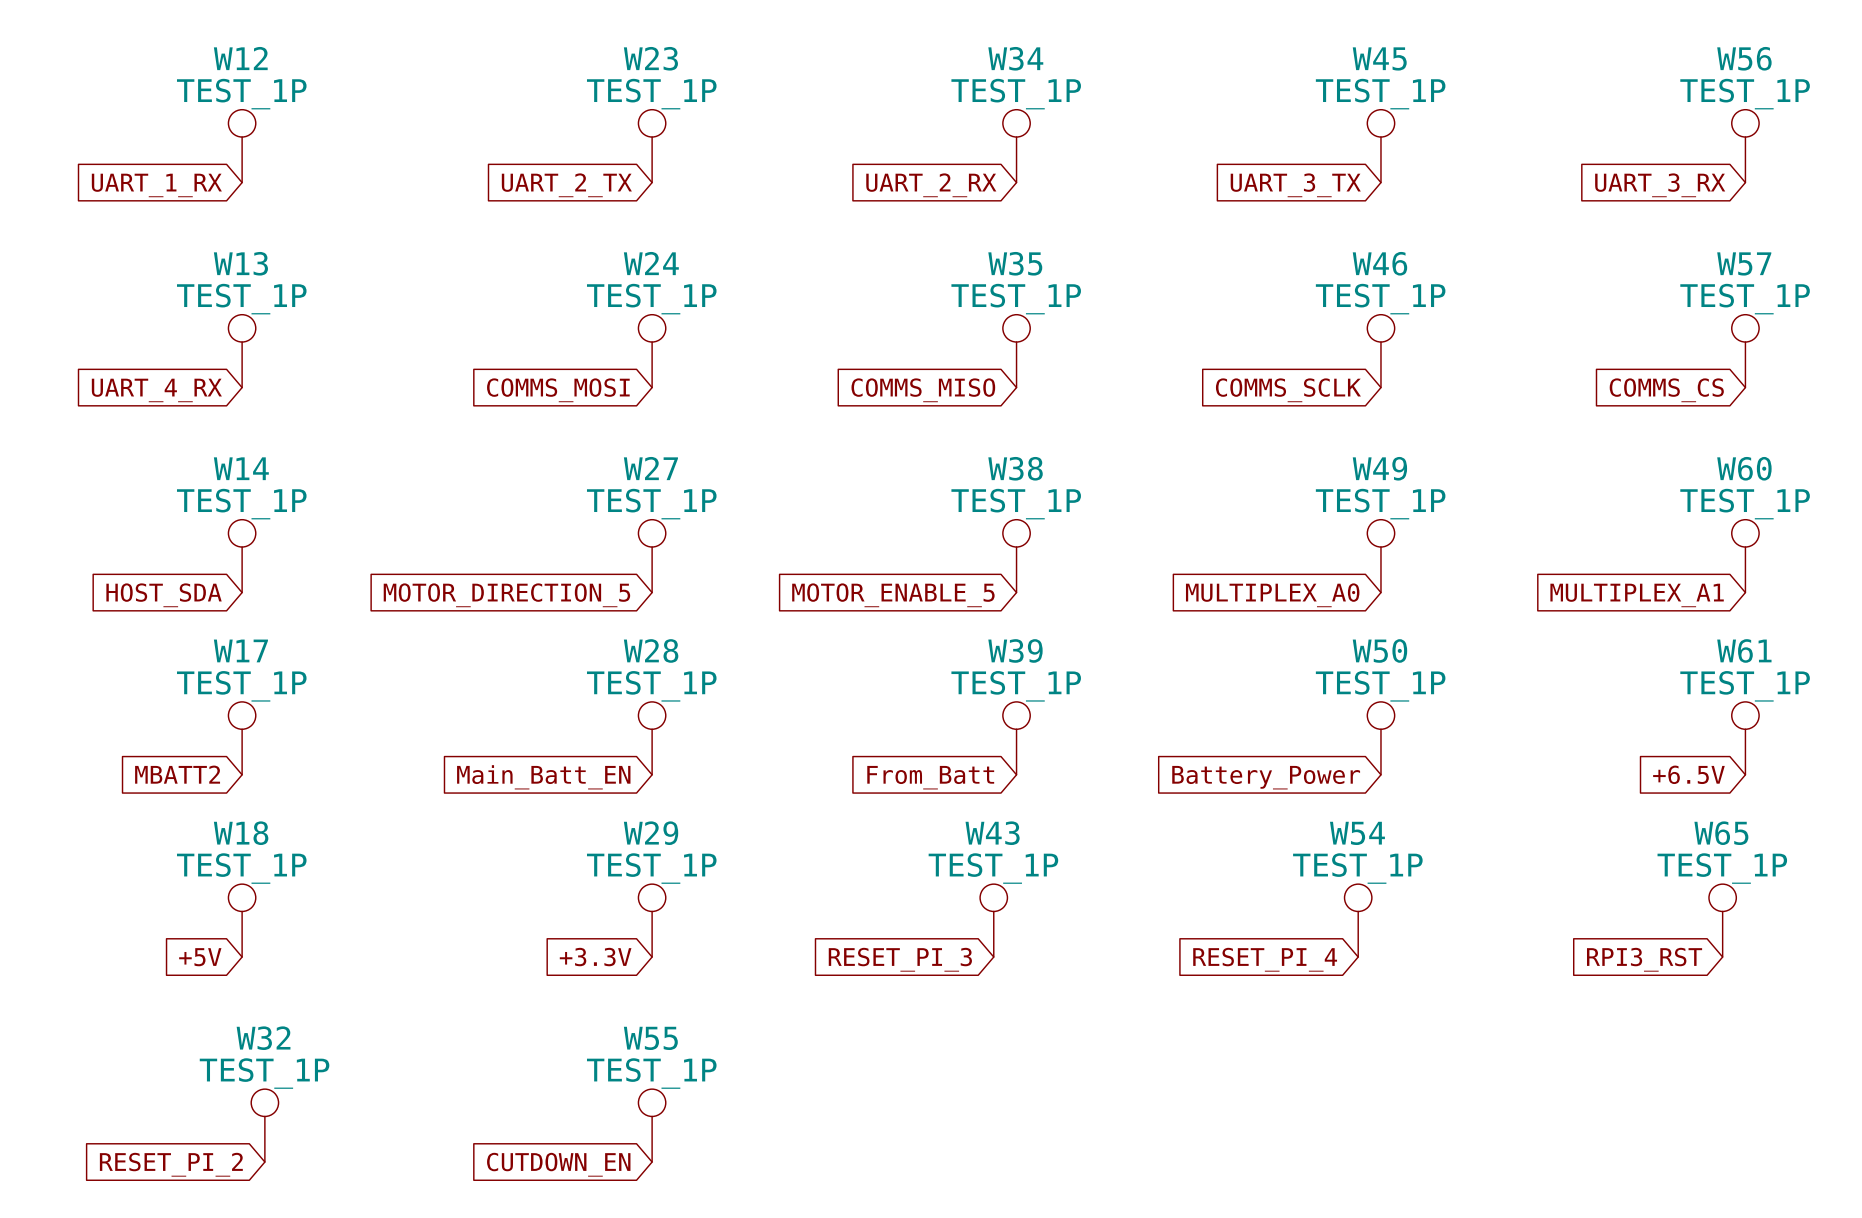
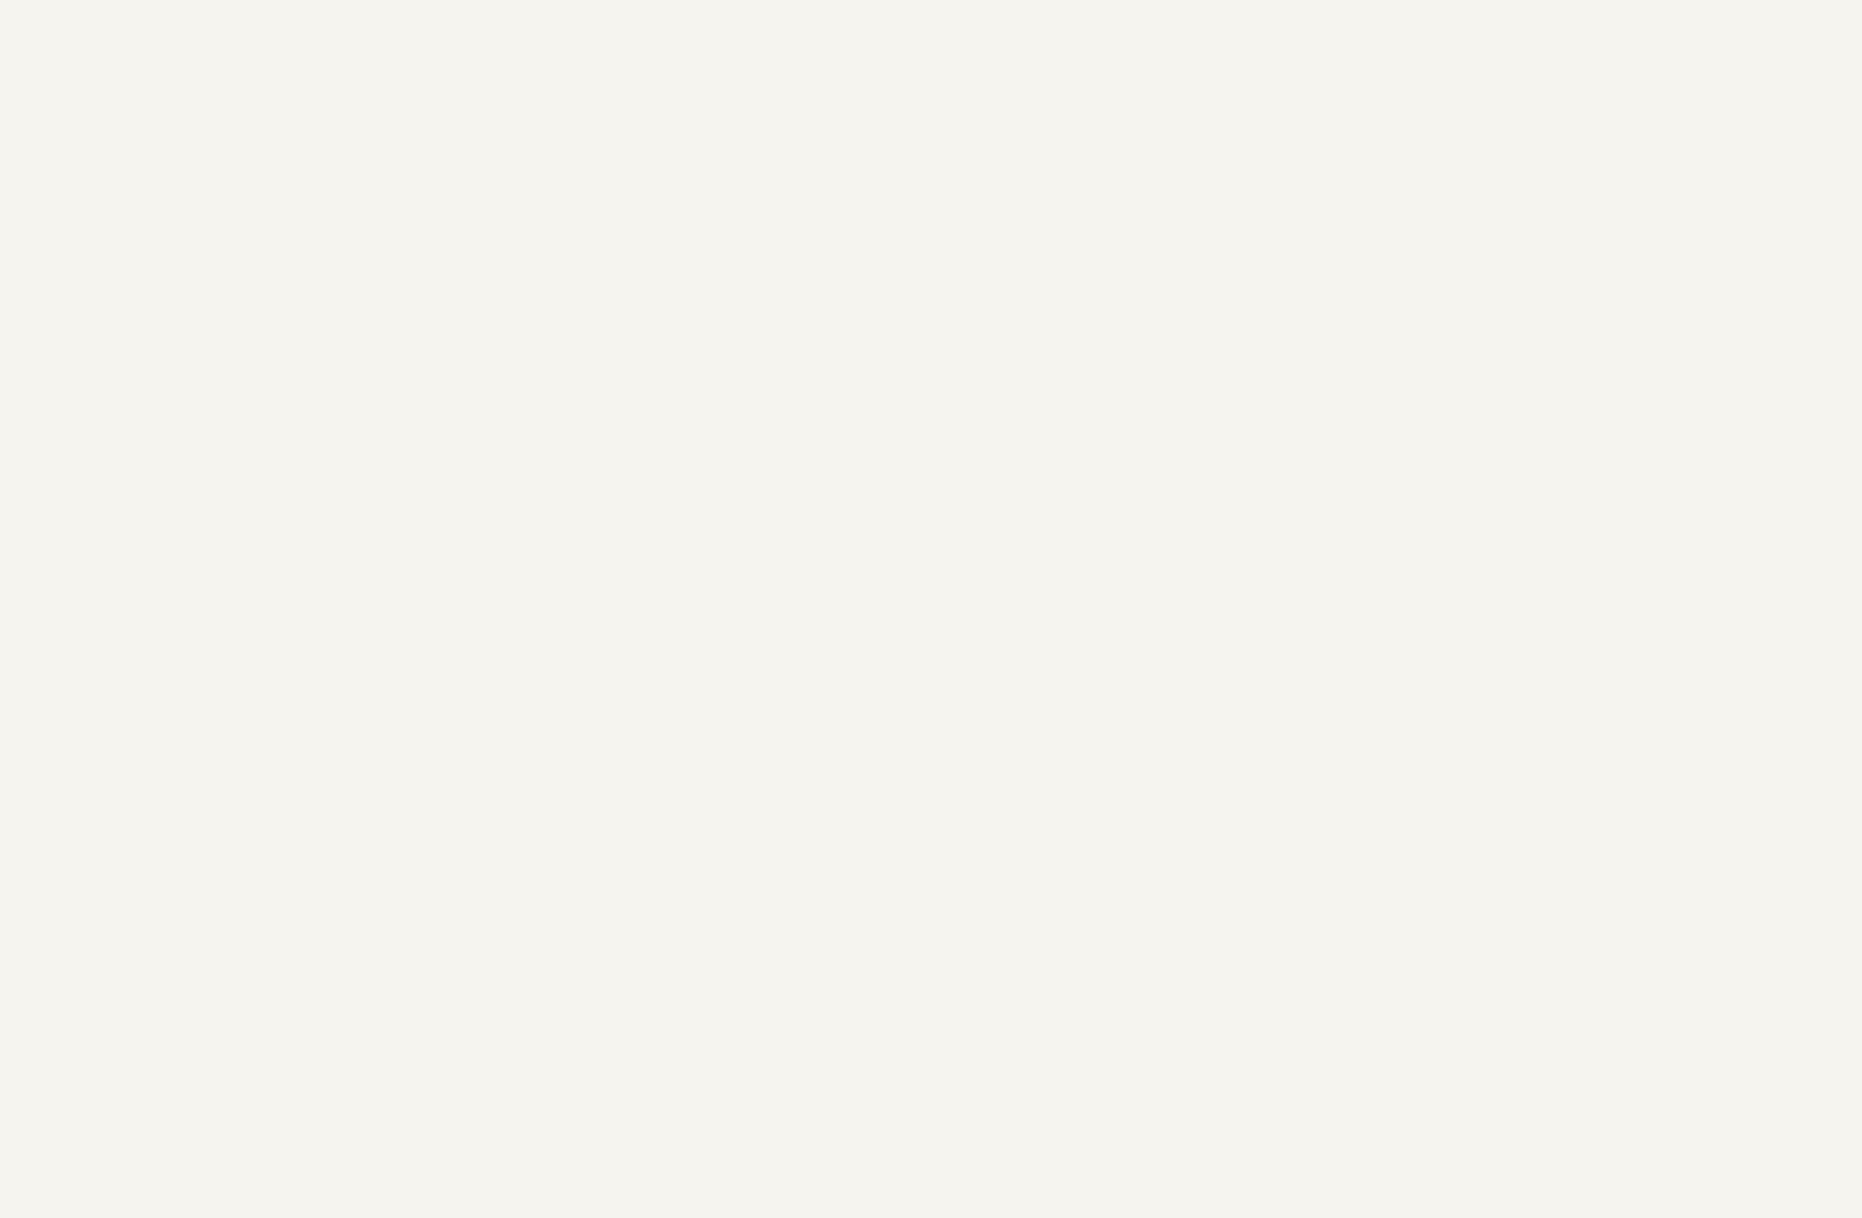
W12: TEST_1P (242, 146) -> none
W23: TEST_1P (652, 146) -> none
W34: TEST_1P (1016, 146) -> none
W45: TEST_1P (1380, 146) -> none
W56: TEST_1P (1745, 146) -> none
global label: UART_1_RX (156, 185) -> none
global label: UART_2_TX (566, 185) -> none
global label: UART_2_RX (931, 185) -> none
global label: UART_3_TX (1295, 185) -> none
global label: UART_3_RX (1660, 185) -> none
W13: TEST_1P (242, 351) -> none
W24: TEST_1P (652, 351) -> none
W35: TEST_1P (1016, 351) -> none
W46: TEST_1P (1380, 351) -> none
W57: TEST_1P (1745, 351) -> none
global label: UART_4_RX (156, 390) -> none
global label: COMMS_MOSI (558, 390) -> none
global label: COMMS_MISO (923, 390) -> none
global label: COMMS_SCLK (1288, 390) -> none
global label: COMMS_CS (1666, 390) -> none
W14: TEST_1P (242, 556) -> none
W27: TEST_1P (652, 556) -> none
W38: TEST_1P (1016, 556) -> none
W49: TEST_1P (1380, 556) -> none
W60: TEST_1P (1745, 556) -> none
global label: HOST_SDA (164, 595) -> none
global label: MOTOR_DIRECTION_5 (506, 595) -> none
global label: MOTOR_ENABLE_5 (893, 595) -> none
global label: MULTIPLEX_A0 (1272, 595) -> none
global label: MULTIPLEX_A1 (1637, 595) -> none
W17: TEST_1P (242, 738) -> none
W28: TEST_1P (652, 738) -> none
W39: TEST_1P (1016, 738) -> none
W50: TEST_1P (1380, 738) -> none
W61: TEST_1P (1745, 738) -> none
global label: MBATT2 (177, 774) -> none
global label: +6.5V (1688, 774) -> none
global label: Main_Batt_EN (543, 777) -> none
global label: From_Batt (930, 777) -> none
global label: Battery_Power (1266, 777) -> none
W18: TEST_1P (242, 920) -> none
W29: TEST_1P (652, 920) -> none
W43: TEST_1P (993, 920) -> none
W54: TEST_1P (1358, 920) -> none
W65: TEST_1P (1722, 920) -> none
global label: +5V (200, 957) -> none
global label: +3.3V (595, 957) -> none
global label: RESET_PI_3 (900, 959) -> none
global label: RESET_PI_4 (1265, 959) -> none
global label: RPI3_RST (1644, 959) -> none
W32: TEST_1P (264, 1125) -> none
W55: TEST_1P (652, 1125) -> none
global label: RESET_PI_2 (171, 1164) -> none
global label: CUTDOWN_EN (558, 1164) -> none

